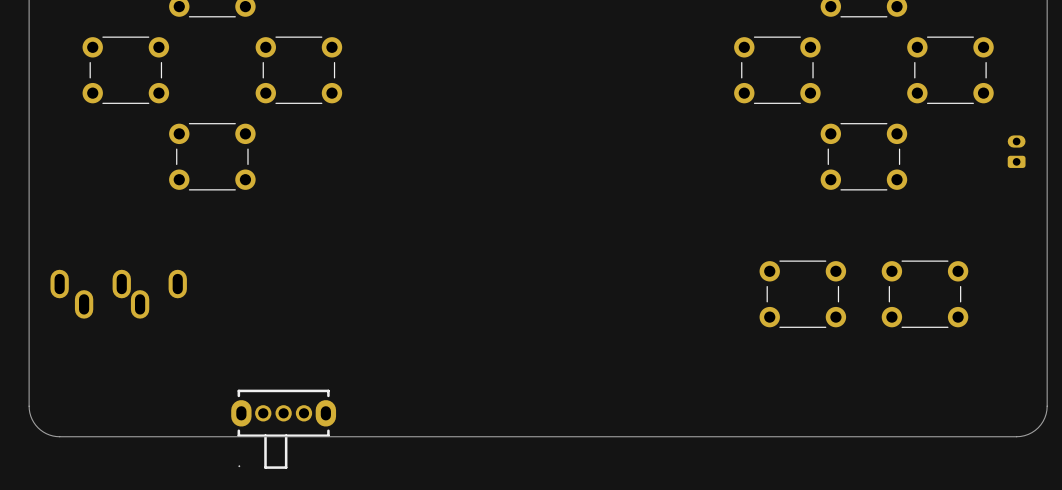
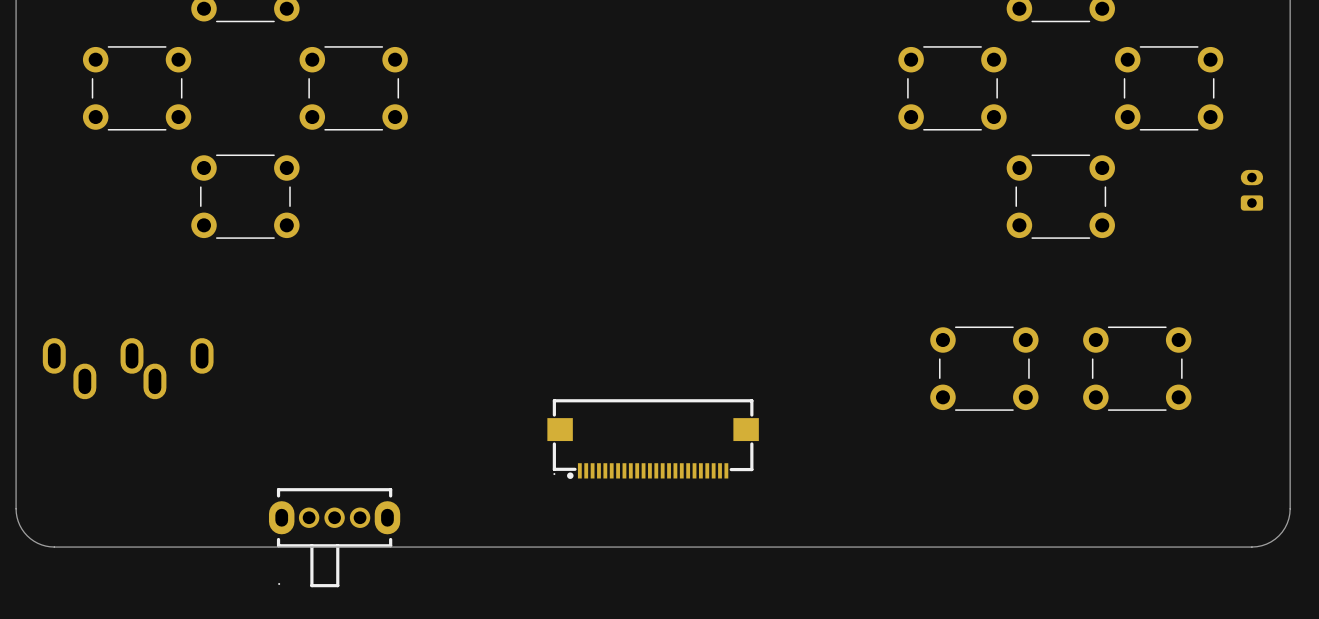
part: none -> (653, 439)

